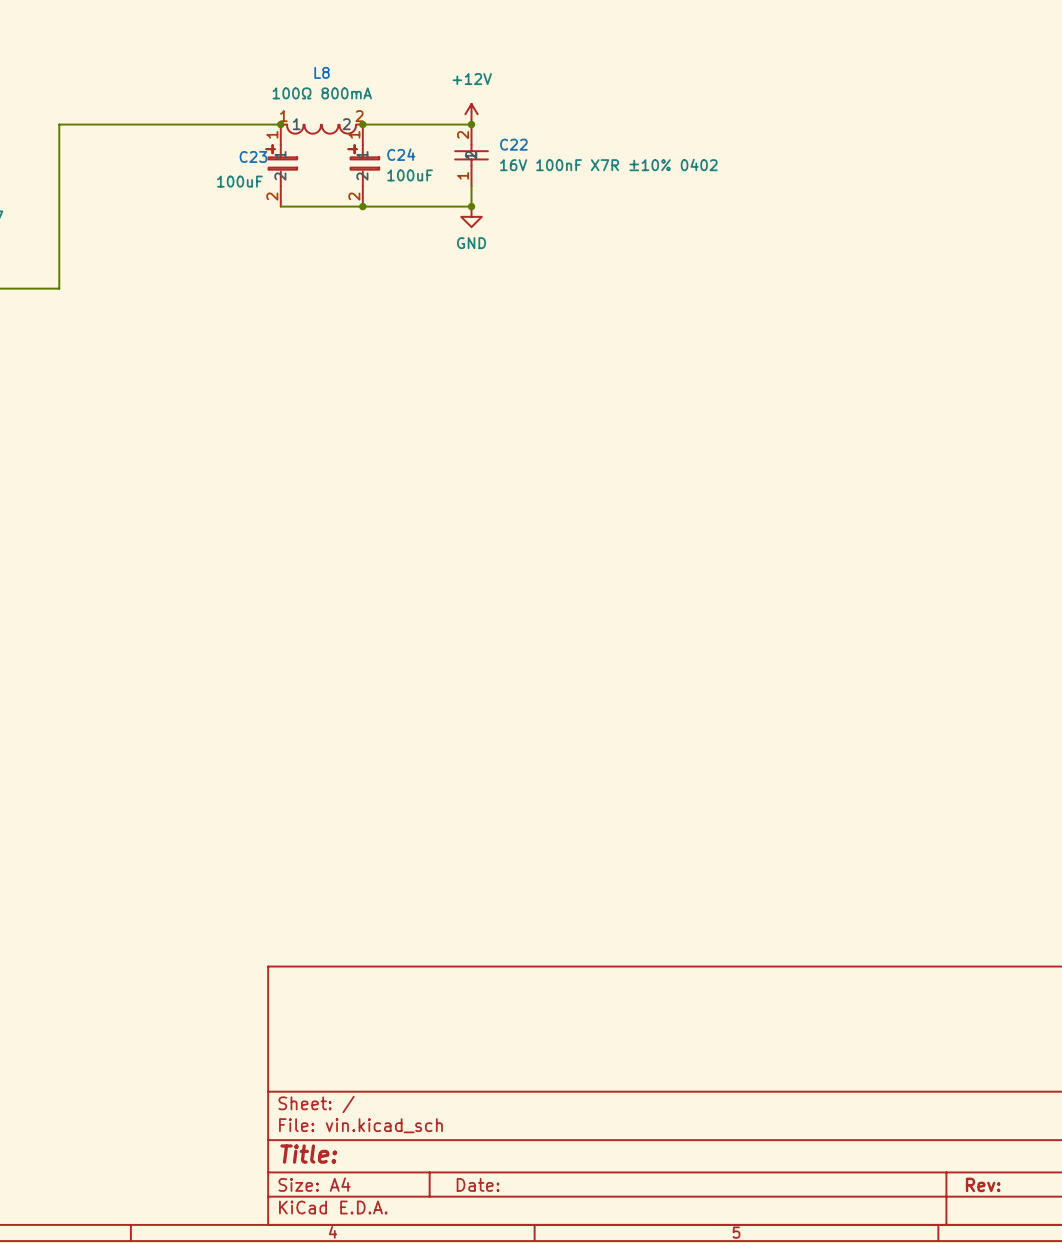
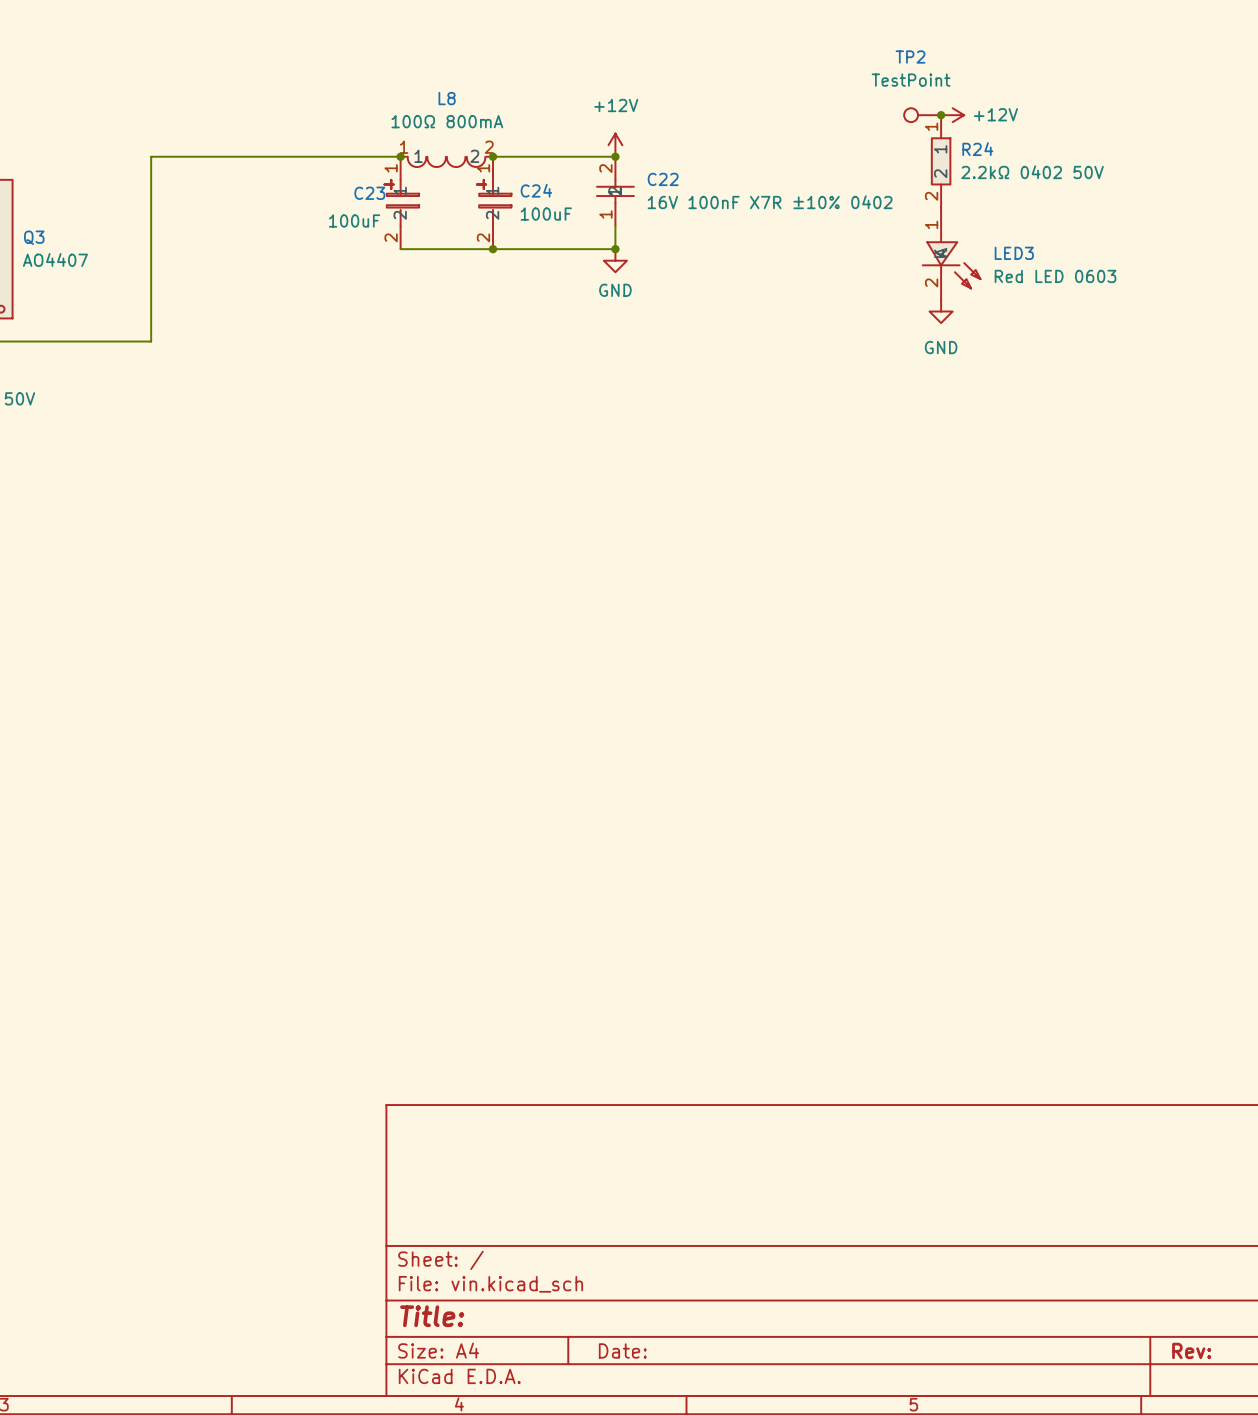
TP2: none -> TestPoint (922, 115)
junction: none -> (941, 115)
power symbol: none -> +12V (952, 115)
R24: none -> 2.2kΩ 0402 50V (941, 161)
LED3: none -> Red LED 0603 (951, 253)
power symbol: none -> GND (941, 311)

